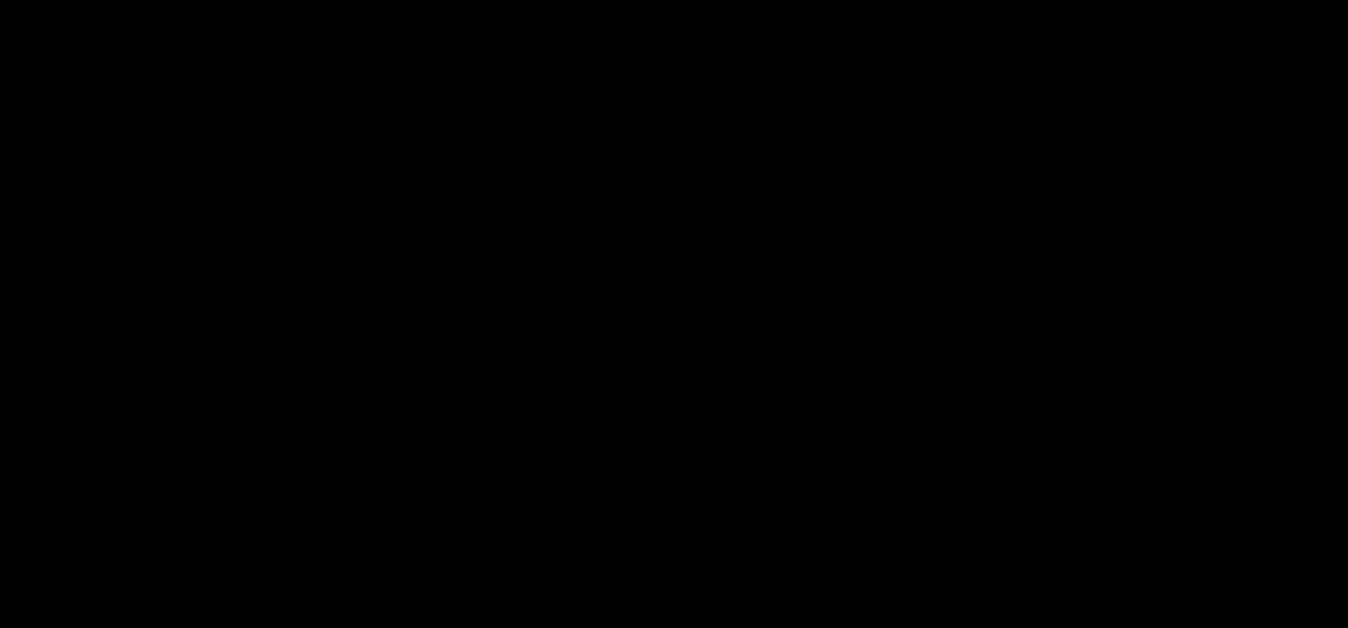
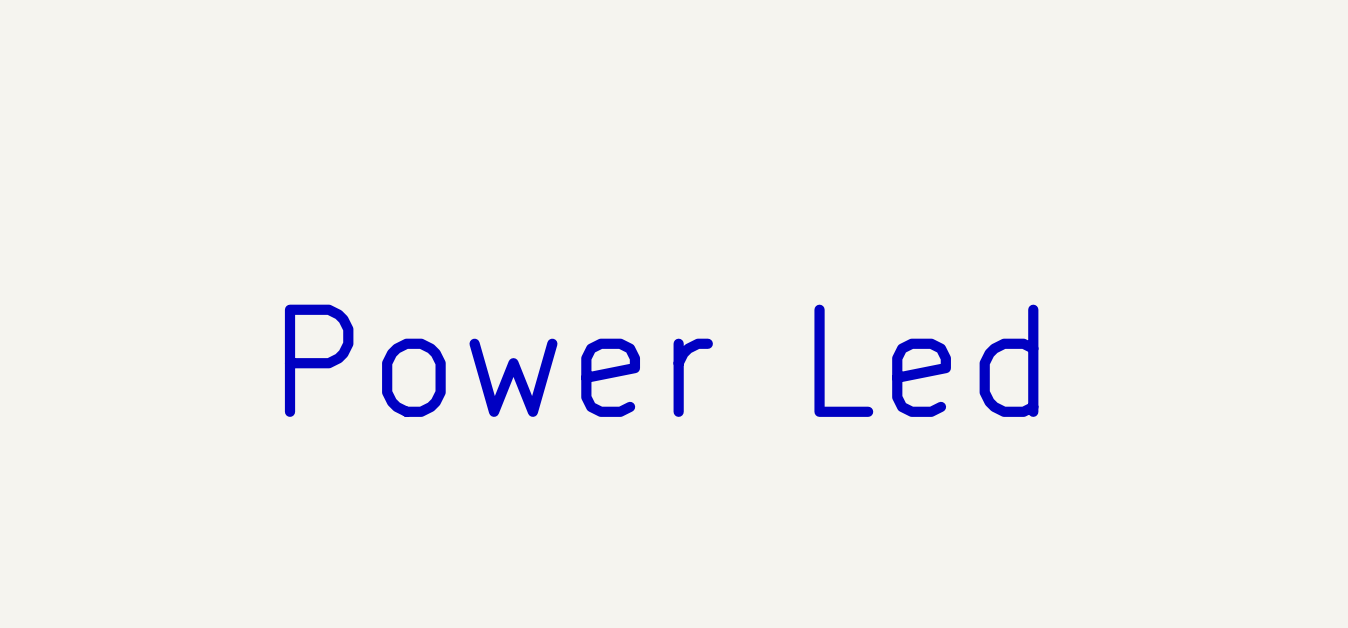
text: none -> Power Led (661, 360)

